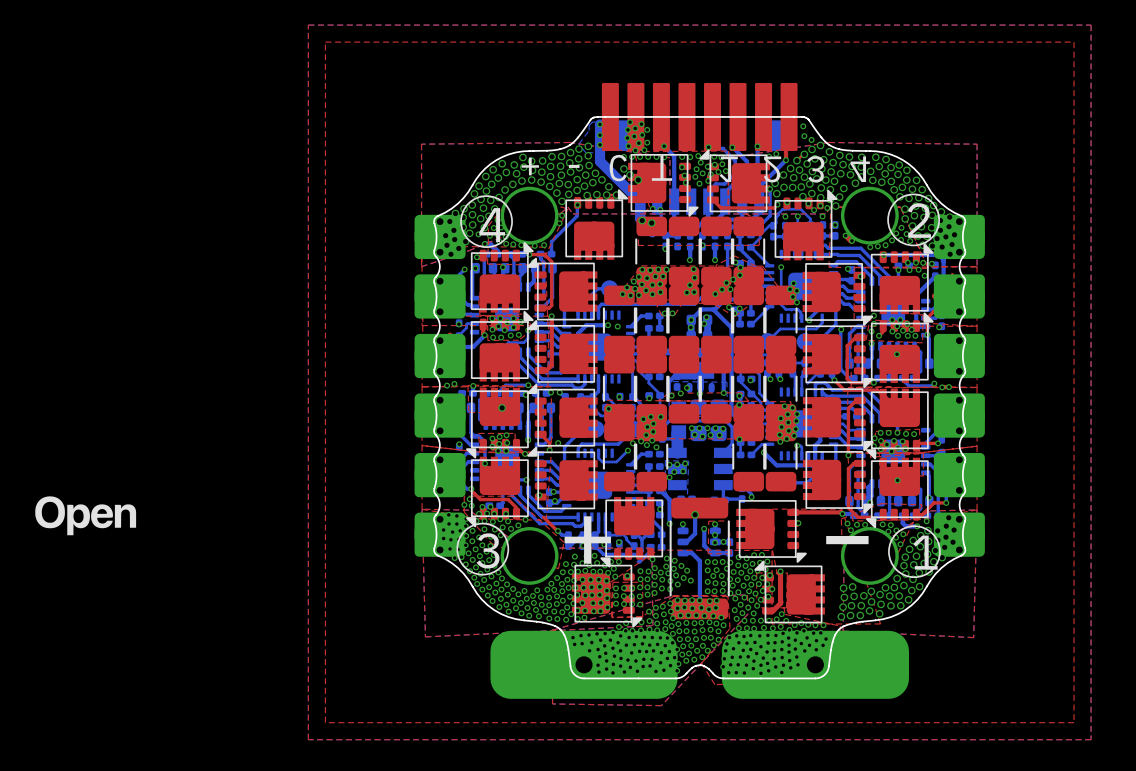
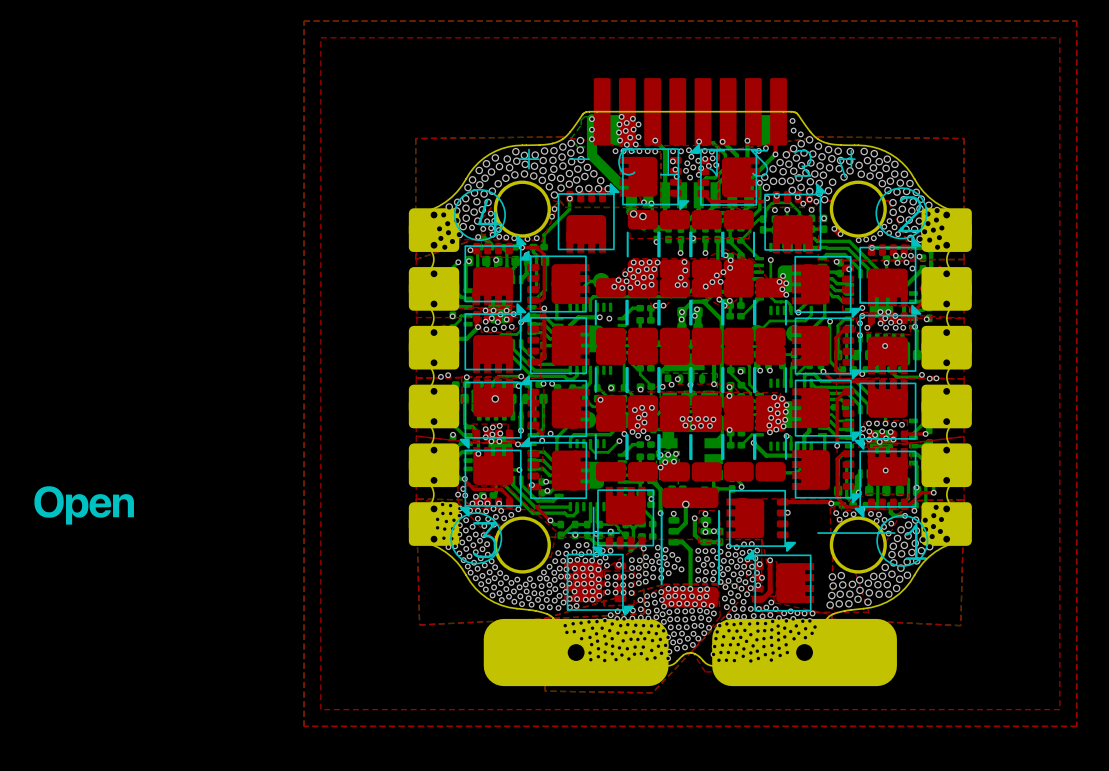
via: (623, 168) -> none
via: (629, 174) -> none
via: (638, 180) -> none
part: none -> (674, 447)
part: none -> (706, 447)

